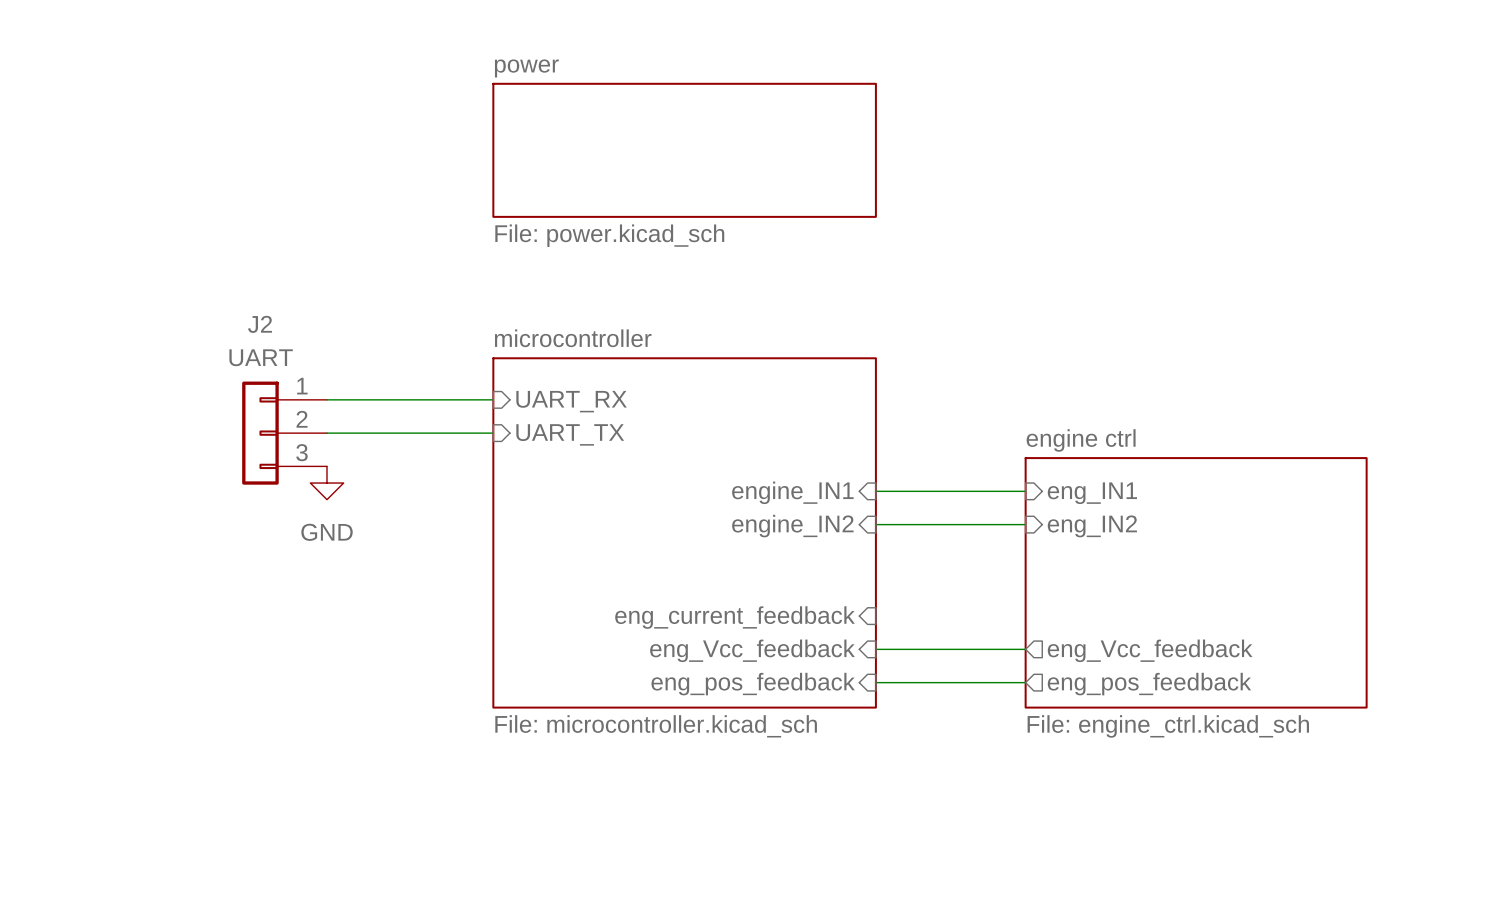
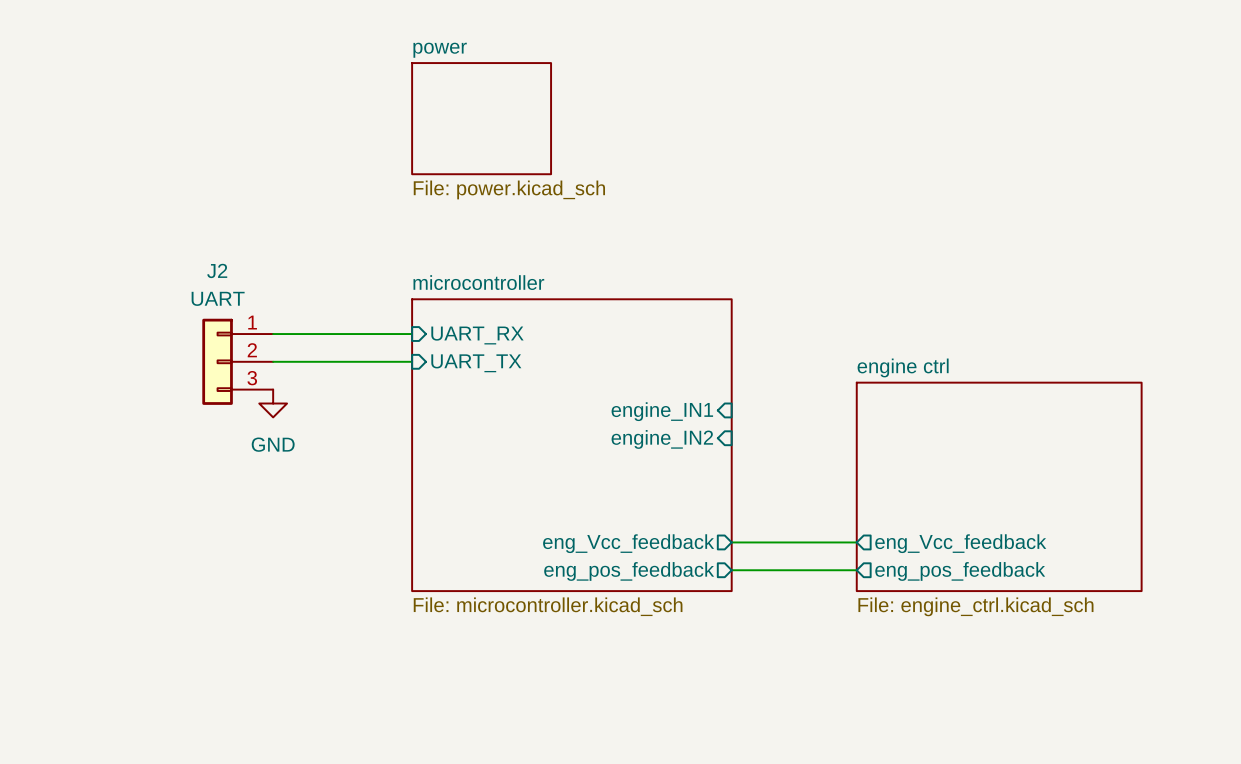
sheet power: none -> File: power.kicad_sch (481, 118)
sheet power: File: power.kicad_sch (684, 150) -> none
wire: (875, 491) (1025, 491) -> none
sheet pin: eng_IN1 (1092, 493) -> none
wire: (875, 524) (1025, 524) -> none
sheet pin: eng_IN2 (1092, 526) -> none
sheet pin: eng_current_feedback (735, 617) -> none
sheet pin shape: input (752, 650) -> output (628, 543)
sheet pin shape: input (753, 684) -> output (629, 571)

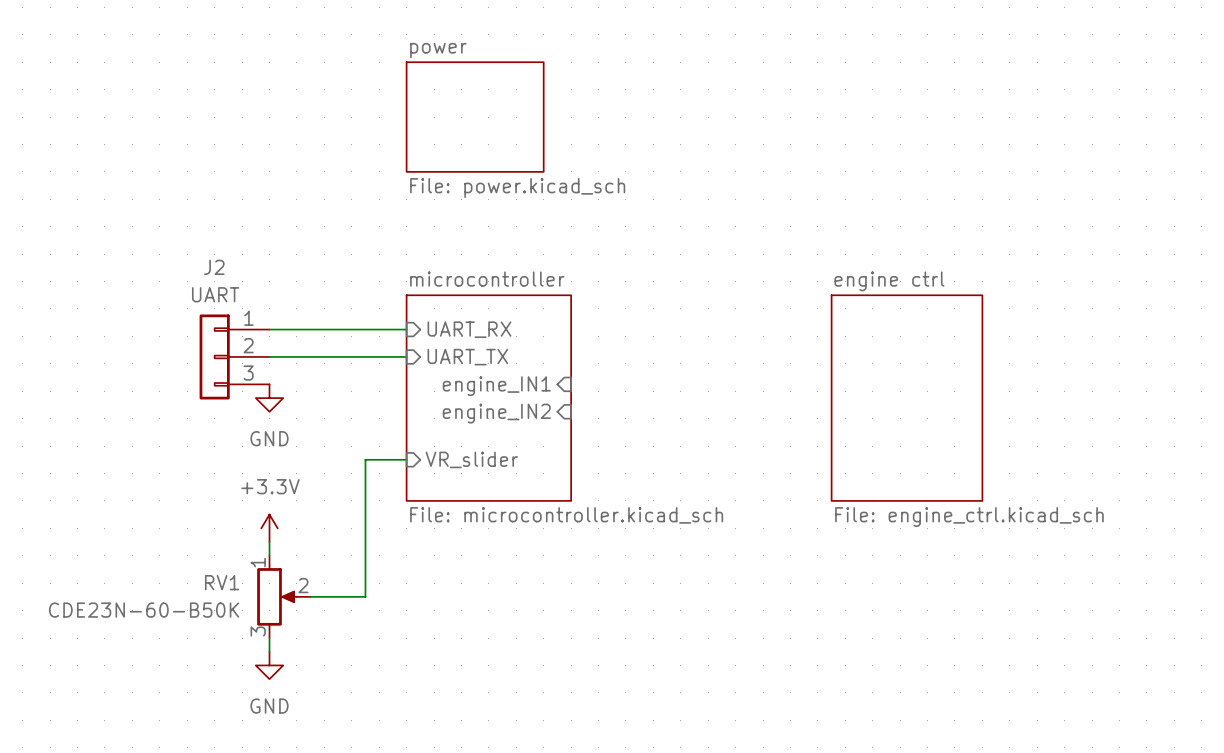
sheet microcontroller: none -> File: microcontroller.kicad_sch (488, 398)
sheet engine ctrl: none -> File: engine_ctrl.kicad_sch (907, 398)
sheet pin position: engine_IN1 (662, 411) -> engine_IN1 (496, 386)
sheet pin position: engine_IN2 (662, 439) -> engine_IN2 (496, 413)
sheet microcontroller: File: microcontroller.kicad_sch (571, 445) -> none
wire: none -> (406, 459) (365, 459) (365, 596) (310, 596)
sheet pin: none -> VR_slider (471, 459)
sheet engine ctrl: File: engine_ctrl.kicad_sch (999, 486) -> none
power symbol: none -> +3.3V (269, 528)
wire: (731, 542) (856, 542) -> none
sheet pin: eng_Vcc_feedback (628, 543) -> none
sheet pin: eng_Vcc_feedback (960, 543) -> none
wire: none -> (269, 542) (269, 555)
wire: (731, 570) (856, 570) -> none
sheet pin: eng_pos_feedback (629, 571) -> none
sheet pin: eng_pos_feedback (960, 571) -> none
RV1: none -> CDE23N-60-B50K (283, 596)
wire: none -> (269, 638) (269, 651)
power symbol: none -> GND (269, 665)

